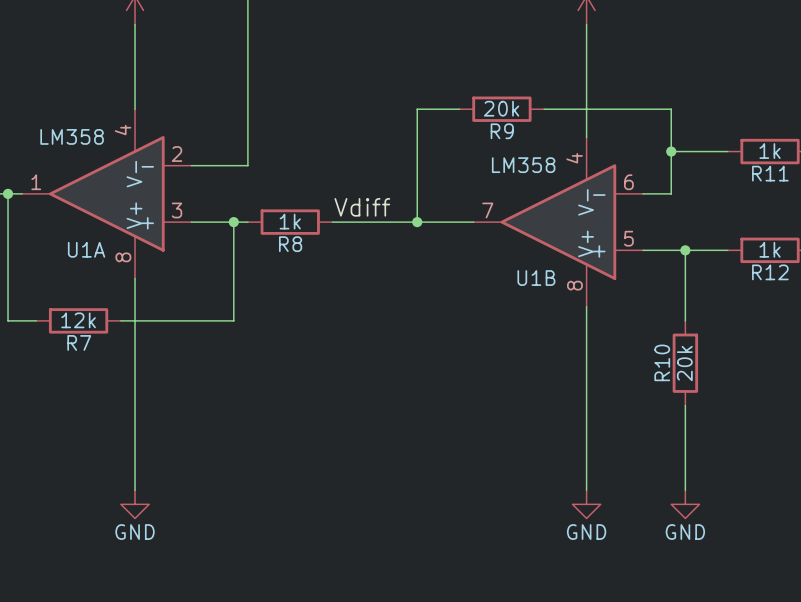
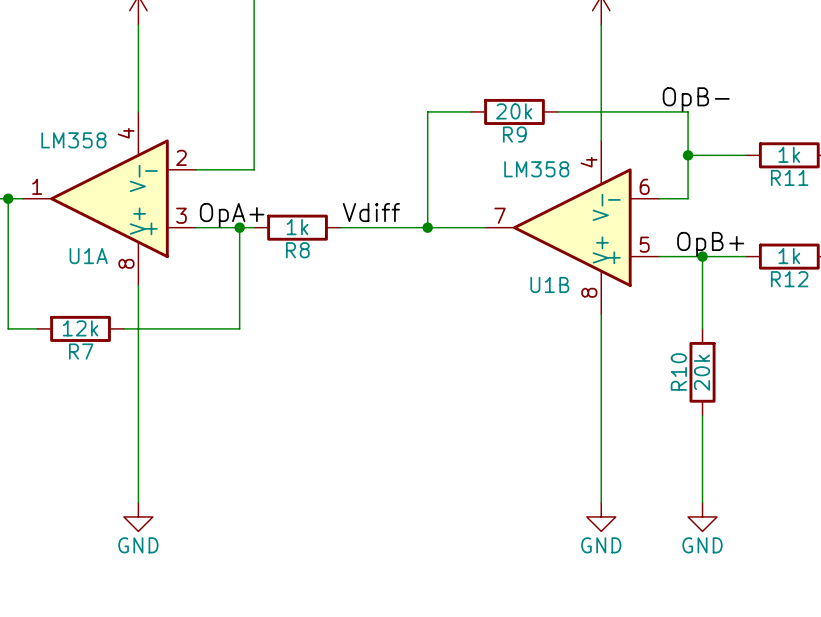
label: none -> OpB- (696, 99)
label: none -> OpA+ (232, 215)
label: none -> OpB+ (710, 244)

